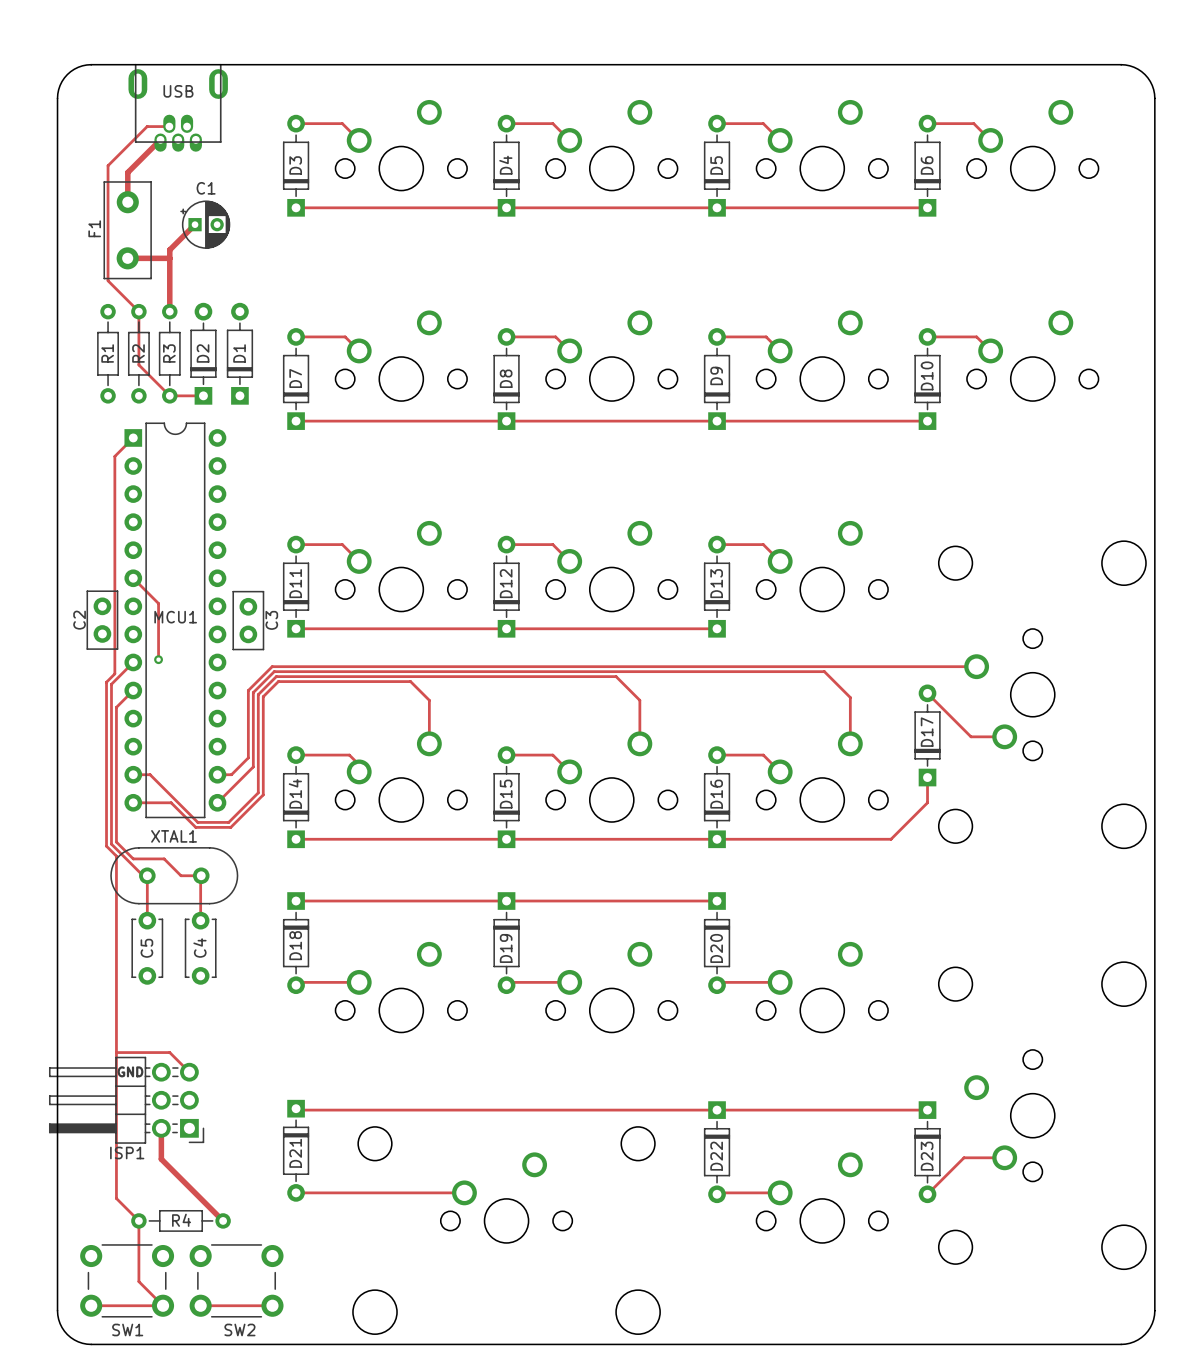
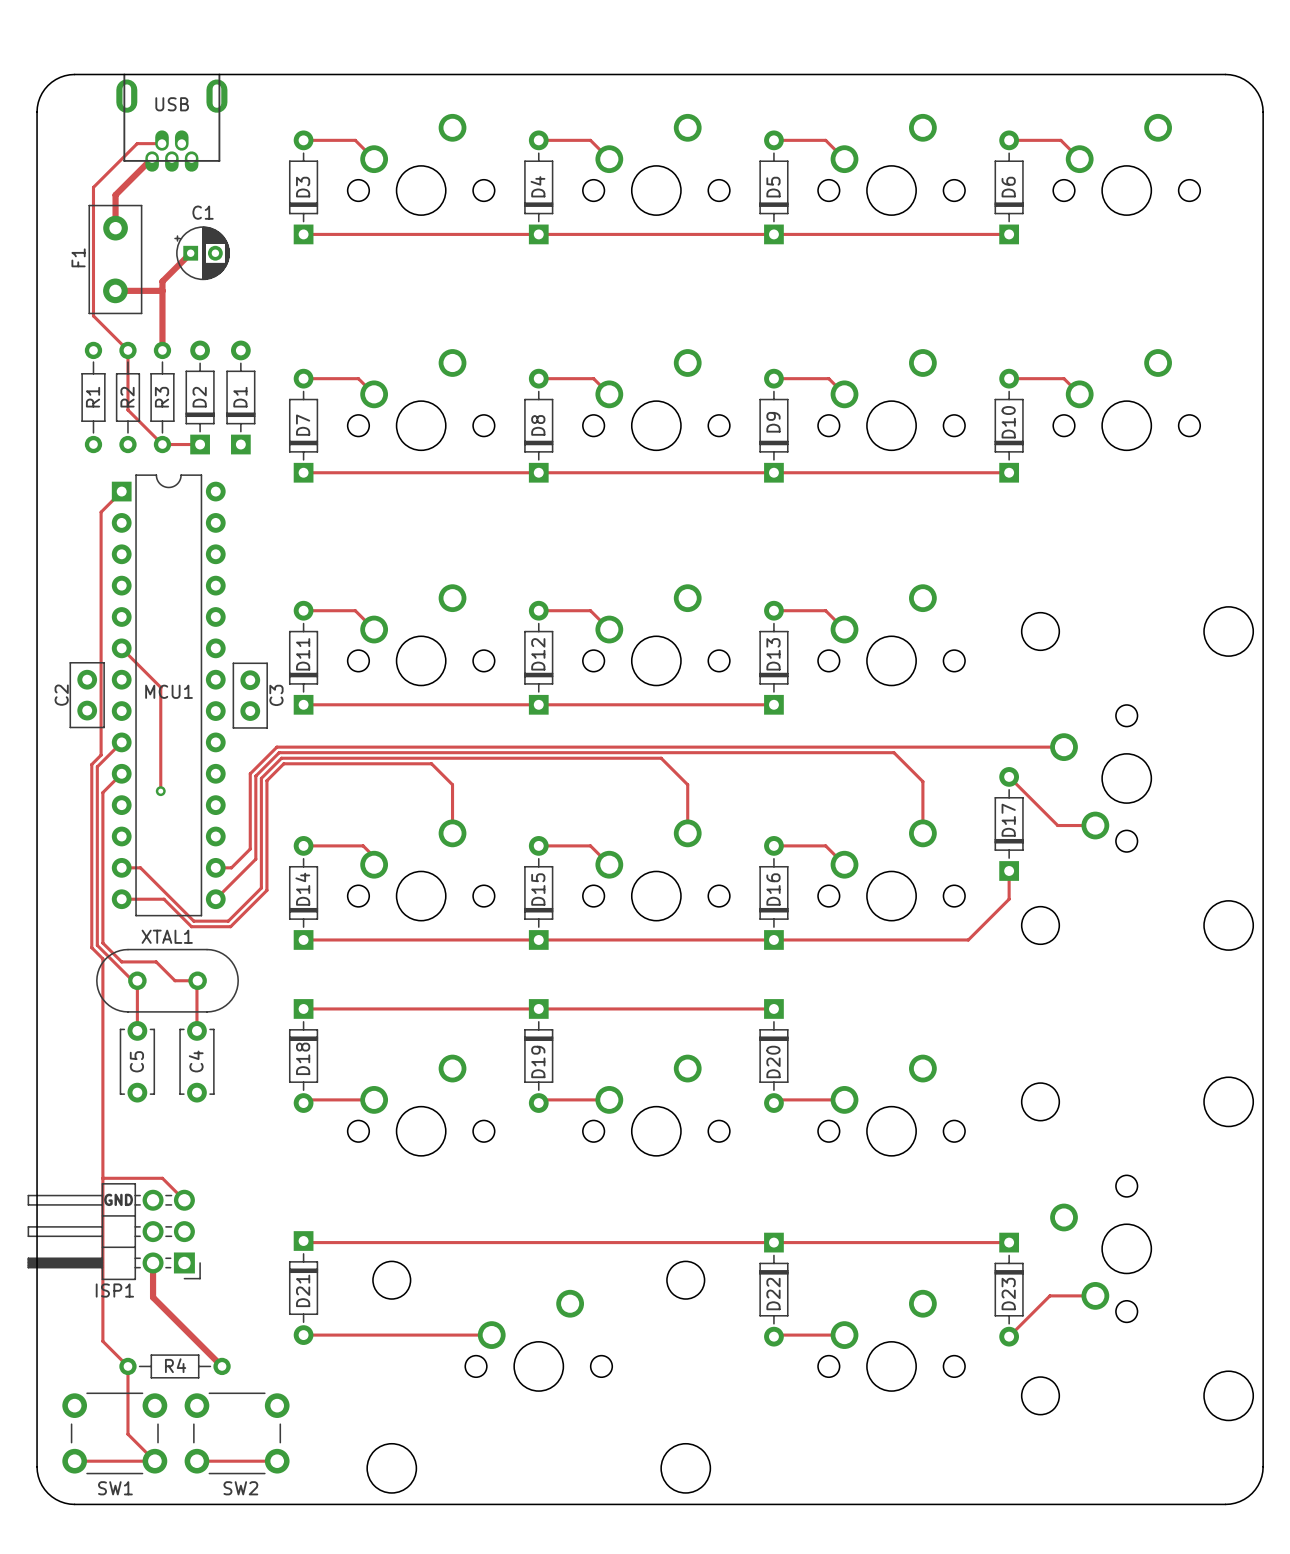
track: (158, 603) (158, 659) -> (149, 676) (160, 687)
track: none -> (160, 687) (160, 791) (162, 789)
via position: (158, 659) -> (160, 791)

